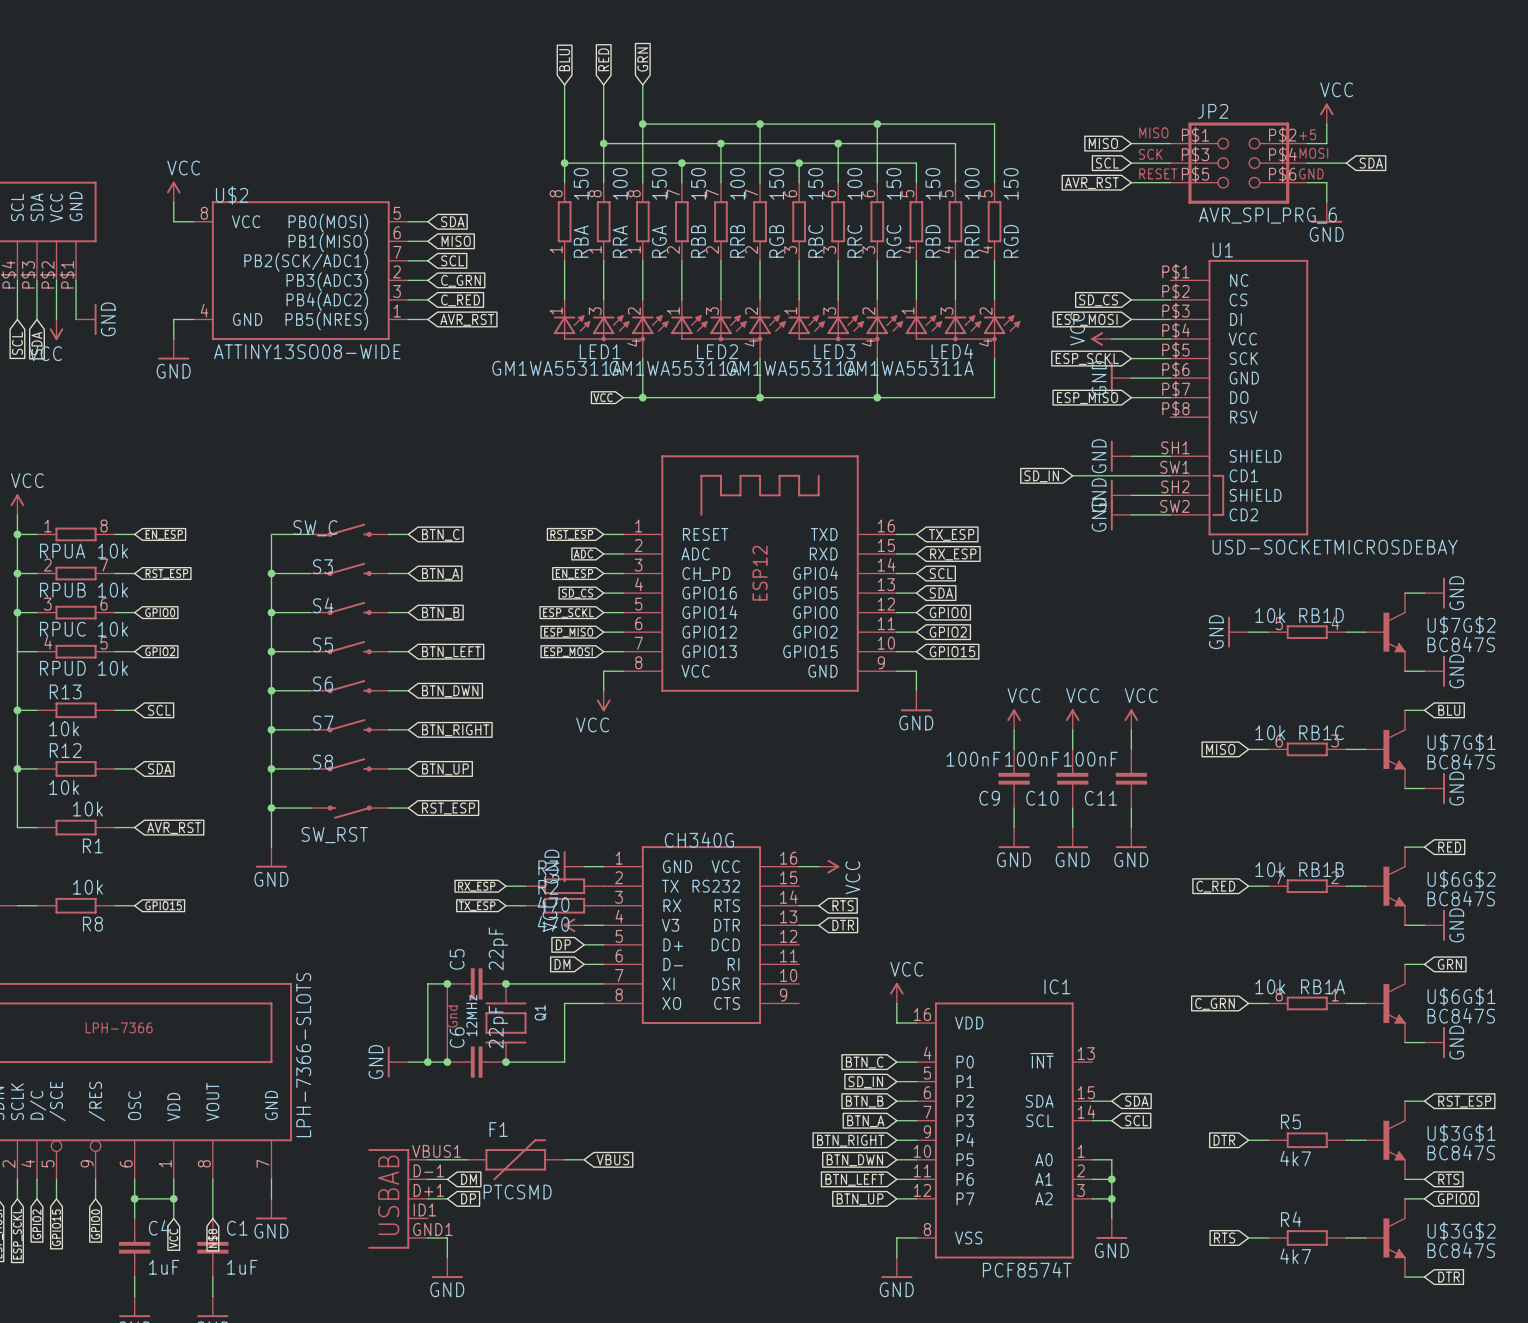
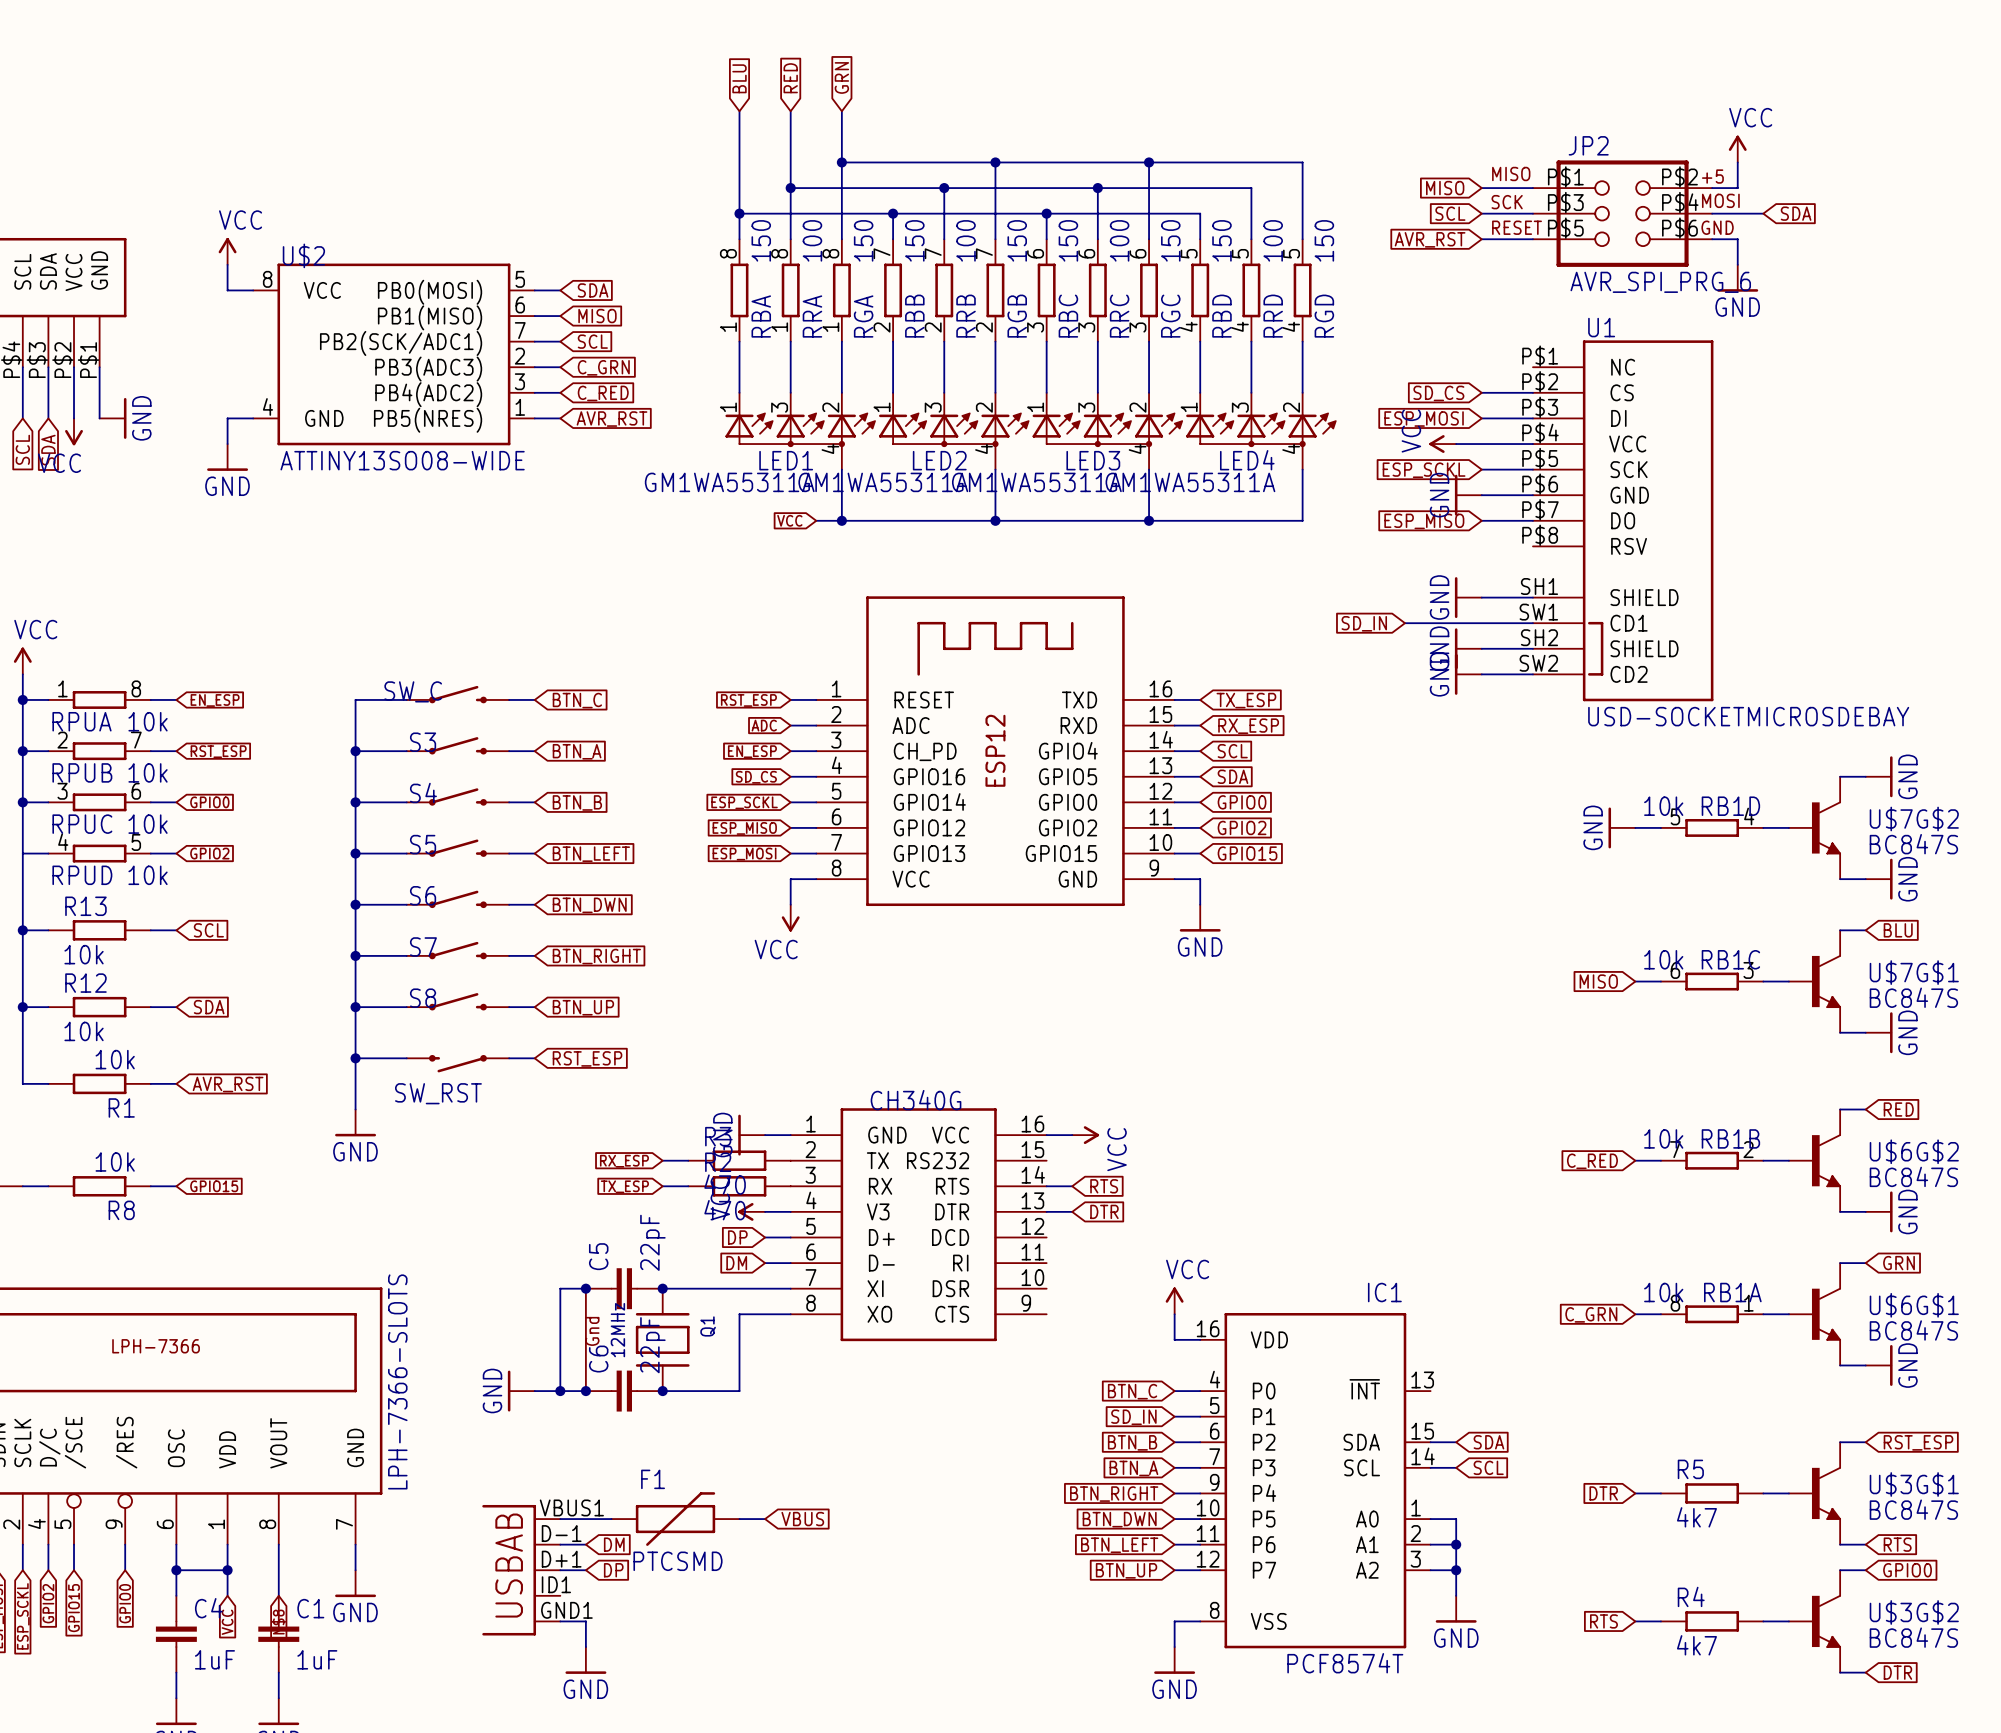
power symbol: VCC (1014, 719) -> none
power symbol: VCC (1072, 719) -> none
power symbol: VCC (1131, 719) -> none
wire: (1014, 729) (1014, 749) -> none
wire: (1072, 729) (1072, 749) -> none
wire: (1131, 729) (1131, 749) -> none
C9: 100nF (1014, 778) -> none
C10: 100nF (1072, 778) -> none
C11: 100nF (1131, 778) -> none
wire: (1014, 808) (1014, 827) -> none
wire: (1072, 808) (1072, 827) -> none
wire: (1131, 808) (1131, 827) -> none
power symbol: GND (1014, 837) -> none
power symbol: GND (1072, 837) -> none
power symbol: GND (1131, 837) -> none

